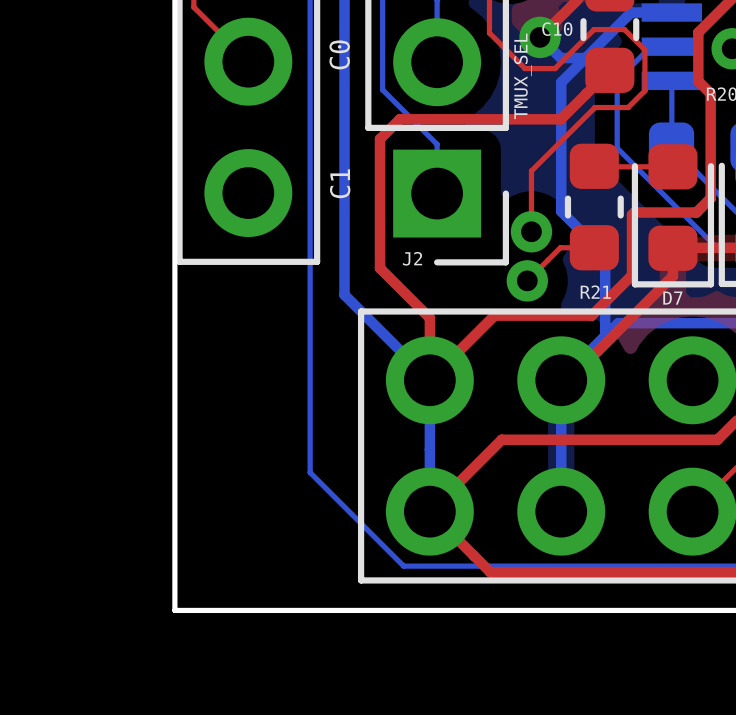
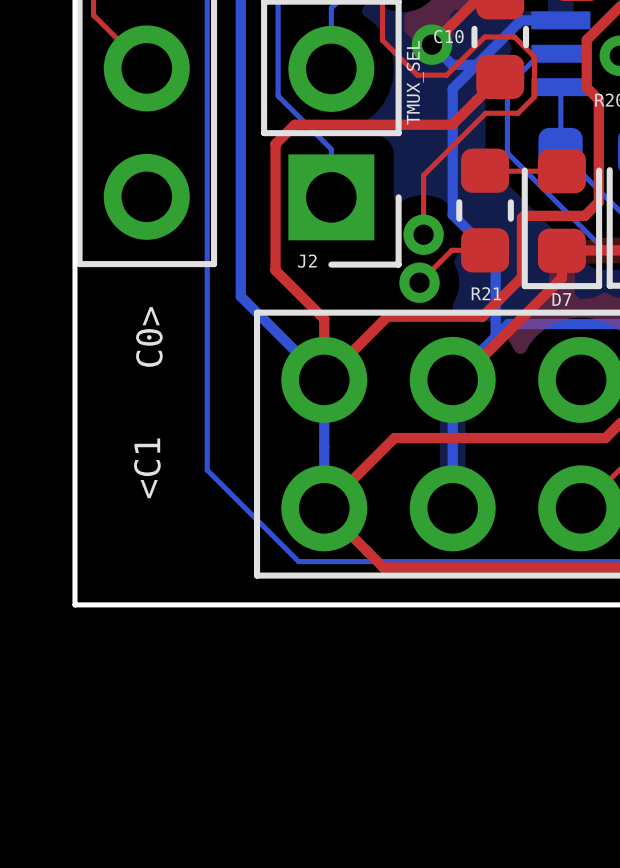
text: C0 (339, 54) -> none
text: C1 (340, 183) -> none
text: none -> C0> (149, 336)
text: none -> <C1 (147, 468)

